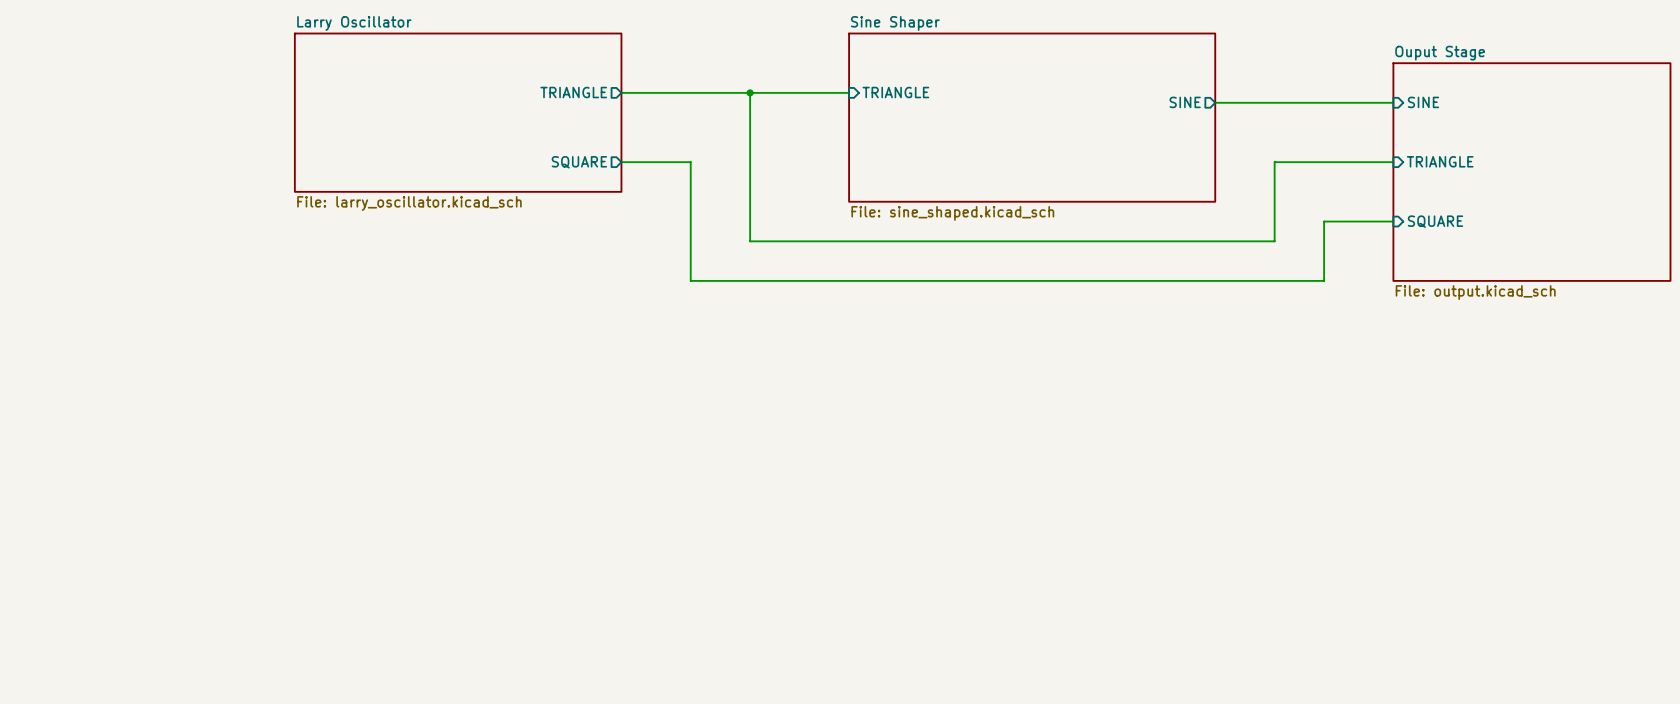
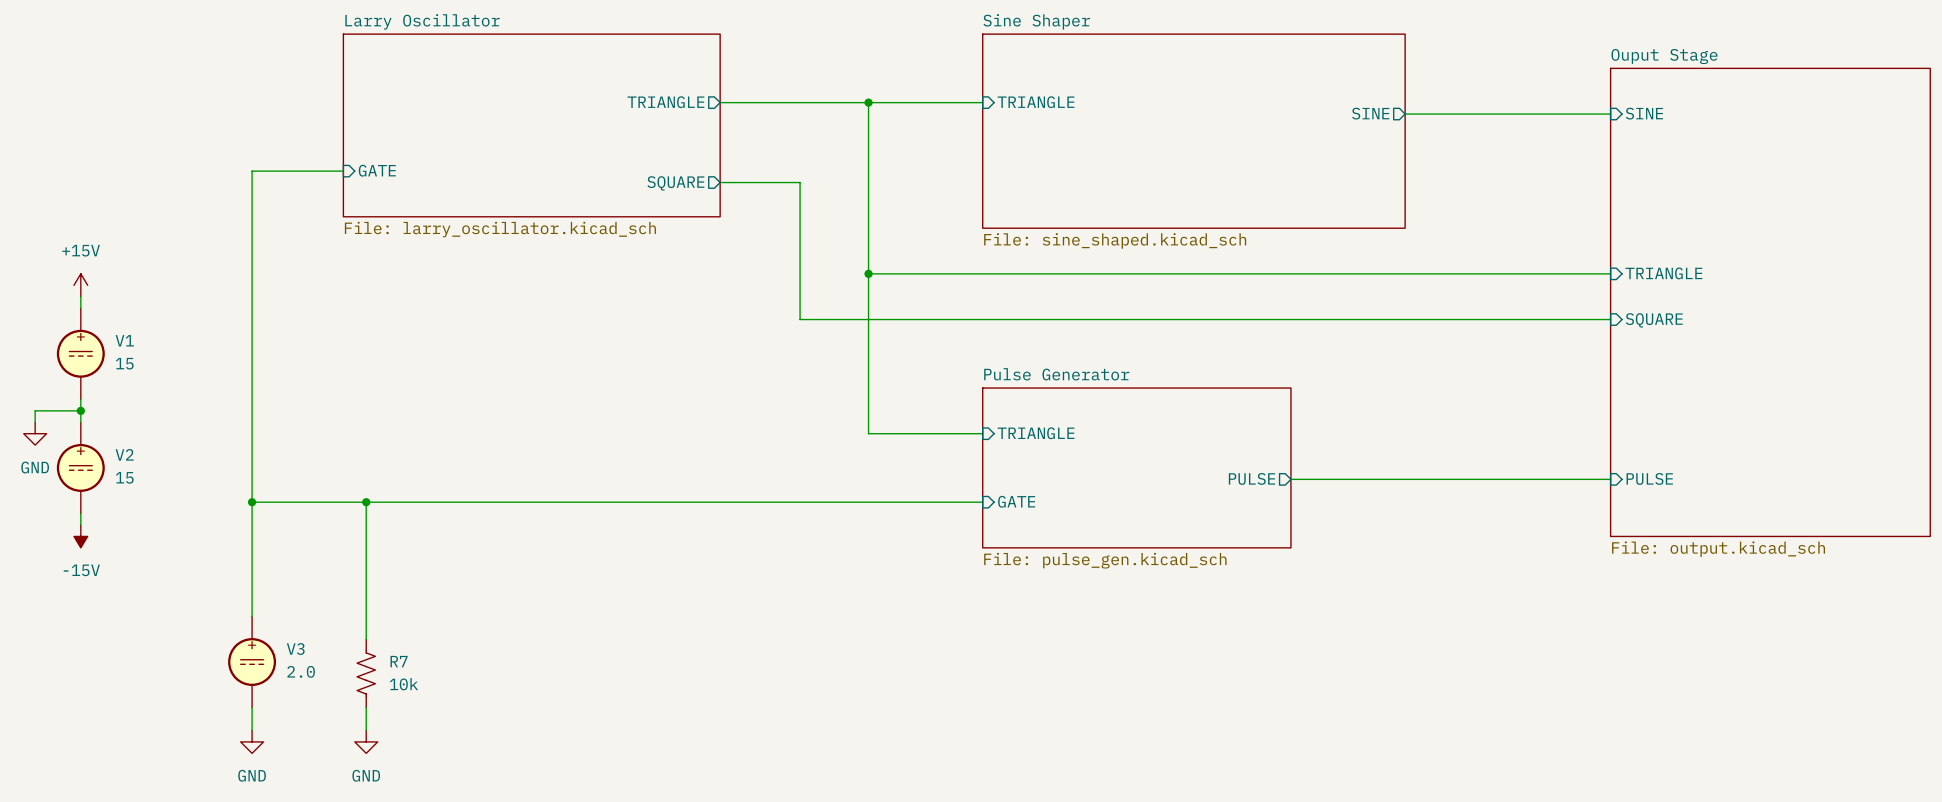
sheet pin: none -> GATE (377, 170)
wire: none -> (343, 171) (252, 171) (252, 616)
sheet pin position: TRIANGLE (1440, 161) -> TRIANGLE (1663, 273)
wire: (1393, 162) (1274, 162) (1274, 241) -> (1610, 273) (1473, 273)
sheet Ouput Stage: File: output.kicad_sch (1531, 172) -> none
wire: (1393, 221) (1324, 221) (1324, 280) -> (1610, 319) (1530, 319)
sheet pin position: SQUARE (1435, 221) -> SQUARE (1654, 320)
wire: none -> (868, 273) (868, 433) (982, 433)
junction: none -> (868, 273)
power symbol: none -> +15V (80, 285)
wire: none -> (80, 296) (80, 308)
sheet Ouput Stage: none -> File: output.kicad_sch (1770, 302)
V1: none -> 15 (80, 353)
wire: none -> (80, 399) (80, 422)
wire: none -> (80, 410) (35, 410) (35, 422)
junction: none -> (80, 410)
power symbol: none -> GND (35, 433)
sheet pin: none -> TRIANGLE (1036, 433)
V2: none -> 15 (80, 467)
sheet Pulse Generator: none -> File: pulse_gen.kicad_sch (1136, 467)
sheet pin: none -> PULSE (1252, 478)
wire: none -> (1290, 479) (1610, 479)
sheet pin: none -> PULSE (1649, 478)
sheet pin: none -> GATE (1016, 501)
wire: none -> (252, 502) (982, 502)
junction: none -> (252, 502)
wire: none -> (366, 502) (366, 639)
junction: none -> (366, 502)
wire: none -> (80, 513) (80, 525)
power symbol: none -> -15V (80, 536)
V3: none -> 2.0 (252, 662)
R7: none -> 10k (366, 673)
wire: none -> (252, 707) (252, 730)
wire: none -> (366, 707) (366, 730)
power symbol: none -> GND (252, 741)
power symbol: none -> GND (366, 741)

